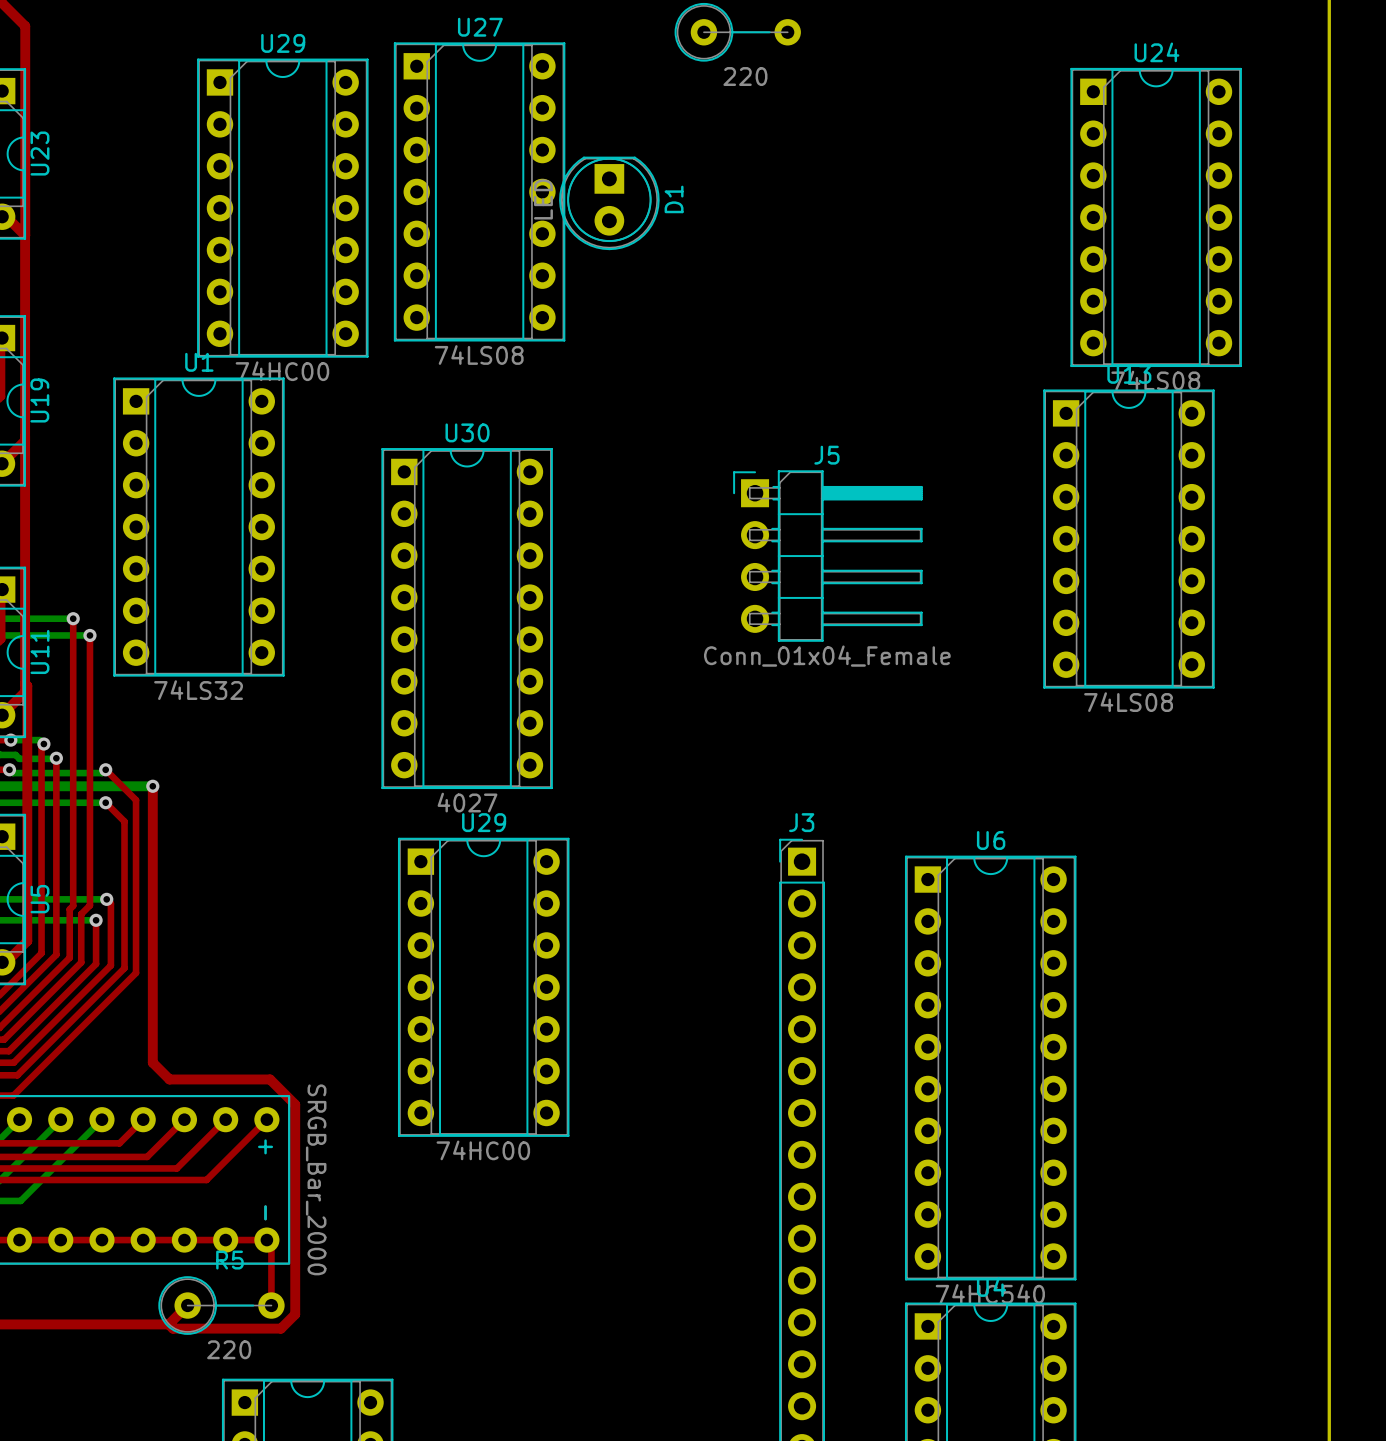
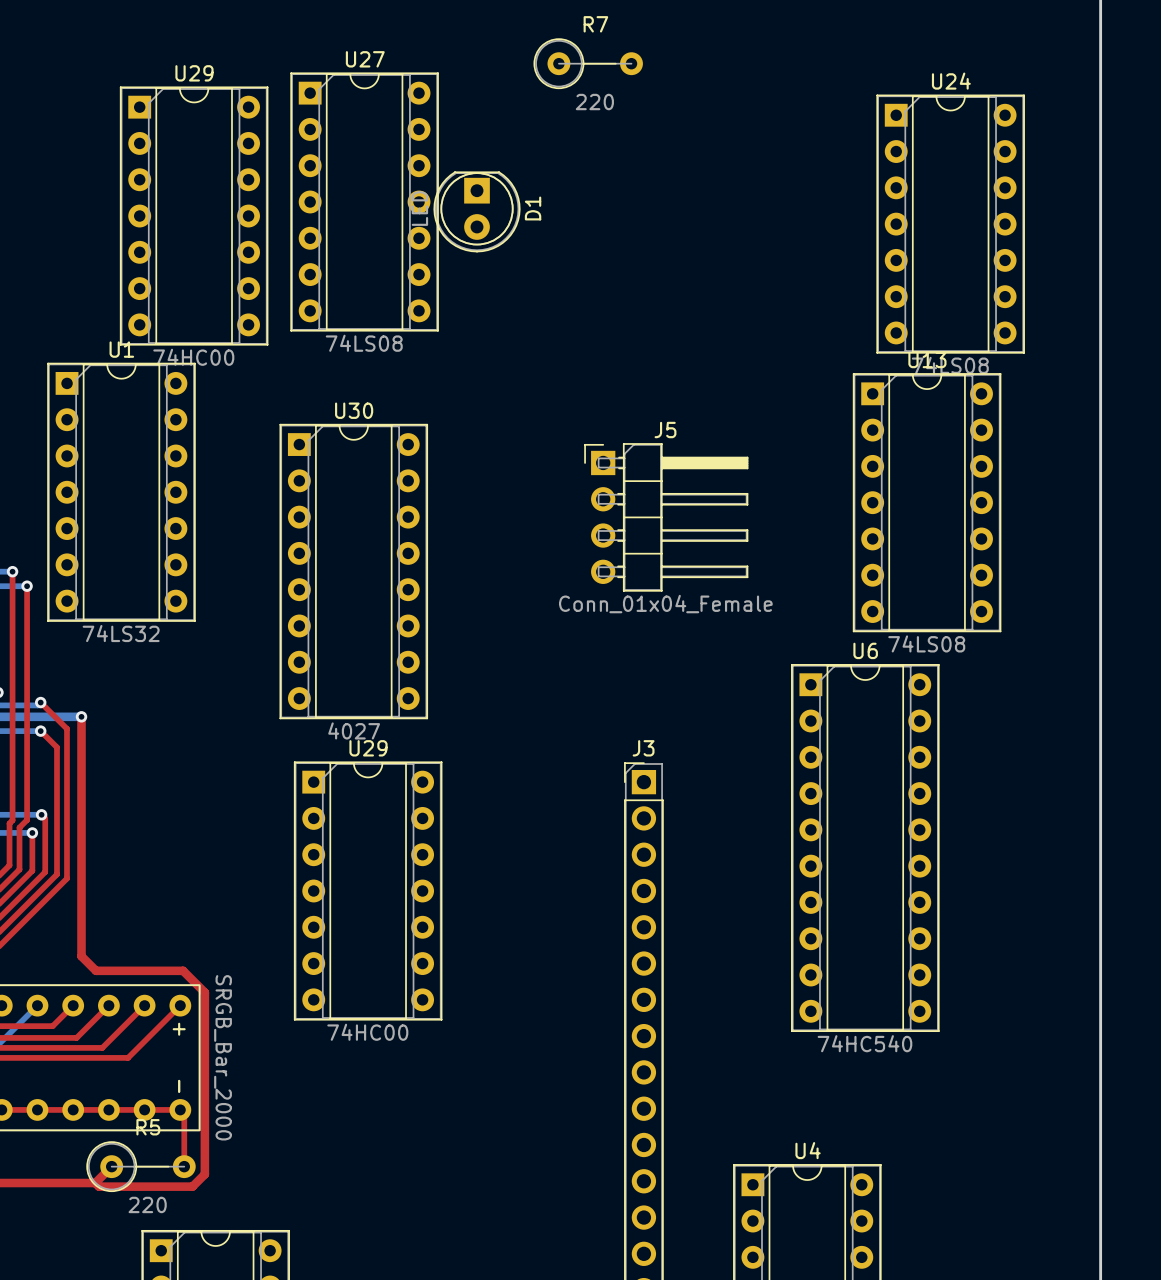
U6 position: (990, 1068) -> (865, 848)

